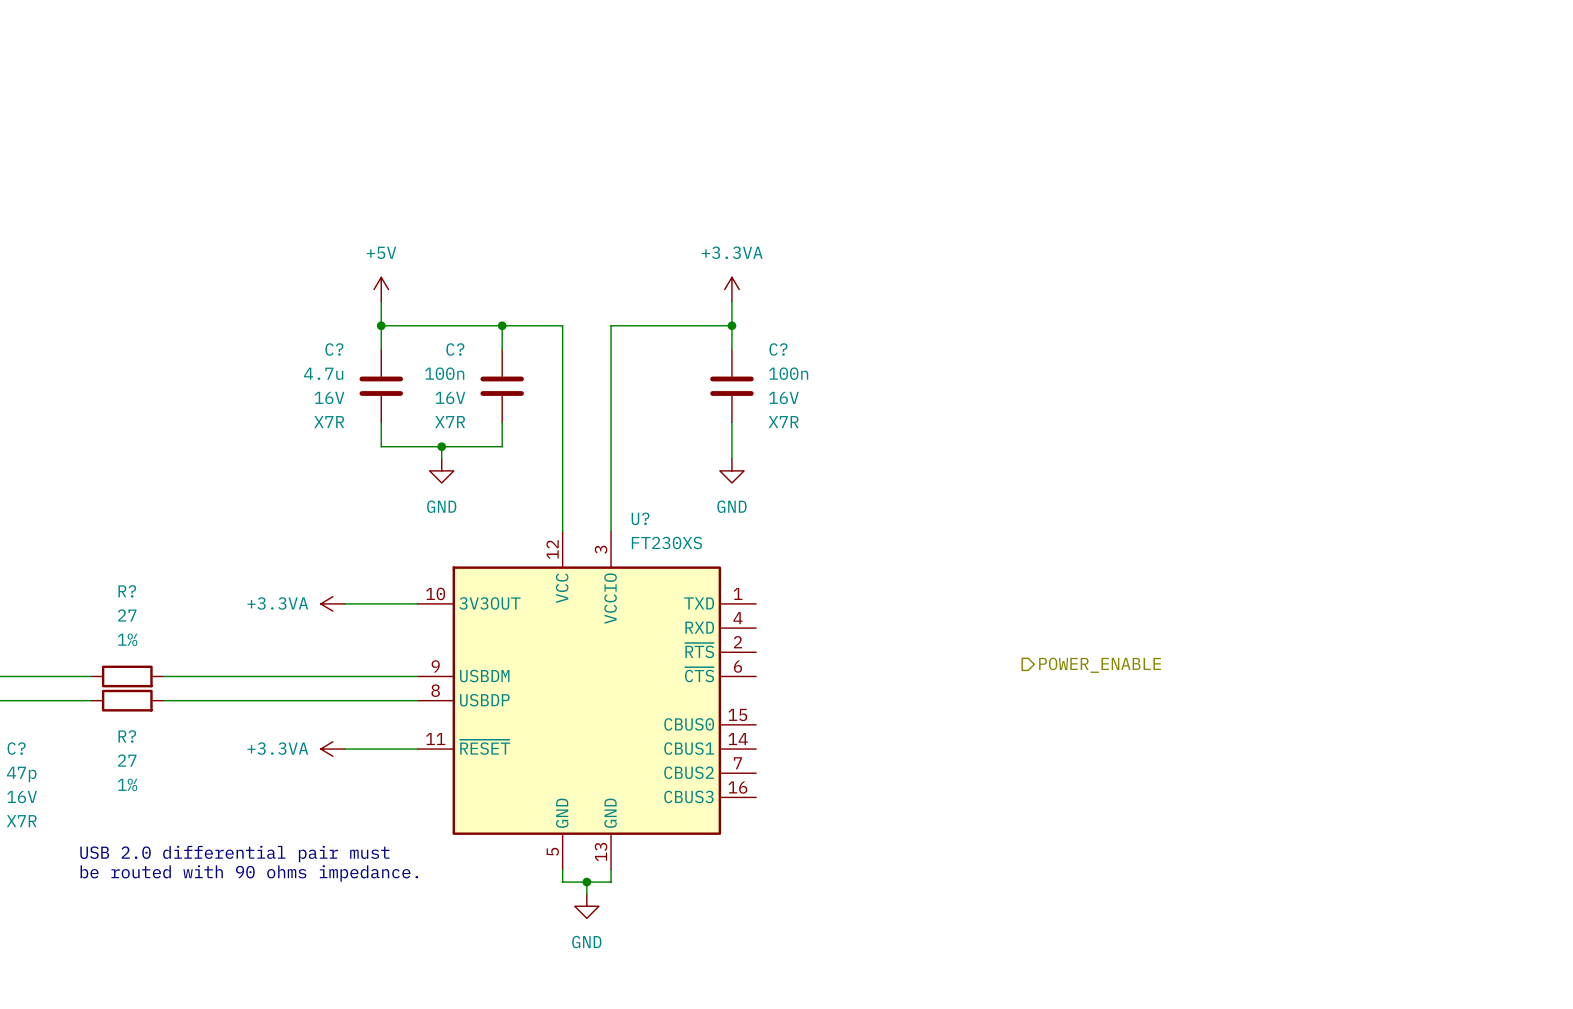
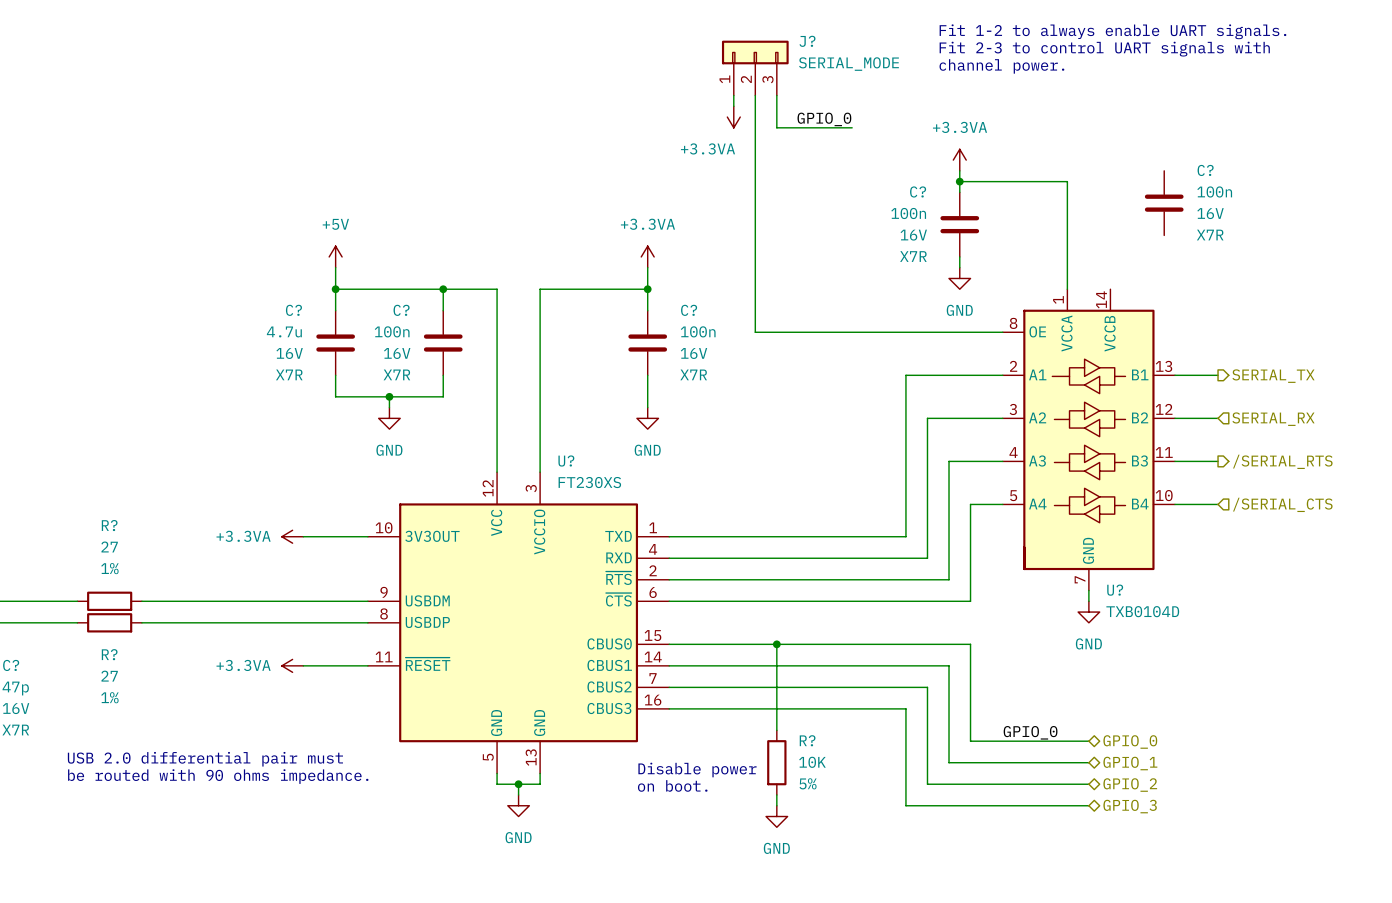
text: none -> Fit 1-2 to always enable UART signals. (1112, 31)
text: none -> Fit 2-3 to control UART signals with (1104, 49)
text: none -> channel power. (1001, 66)
J?: none -> SERIAL_MODE (755, 68)
wire: none -> (733, 95) (733, 106)
wire: none -> (755, 95) (755, 332) (1002, 332)
wire: none -> (776, 95) (776, 127) (852, 127)
power symbol: none -> +3.3VA (733, 117)
label: none -> GPIO_0 (824, 119)
power symbol: none -> +3.3VA (959, 160)
wire: none -> (959, 170) (959, 192)
wire: none -> (959, 181) (1067, 181) (1067, 289)
junction: none -> (959, 181)
C?: none -> 100n (1164, 203)
C?: none -> 100n (959, 224)
wire: none -> (959, 256) (959, 267)
power symbol: none -> GND (959, 278)
wire: none -> (1002, 375) (905, 375) (905, 536) (669, 536)
wire: none -> (1174, 375) (1218, 375)
hierarchical label: none -> SERIAL_TX (1273, 376)
wire: none -> (1002, 418) (927, 418) (927, 558) (669, 558)
wire: none -> (1174, 418) (1218, 418)
hierarchical label: none -> SERIAL_RX (1273, 419)
U?: none -> TXB0104D (1088, 439)
wire: none -> (1002, 461) (949, 461) (949, 579) (669, 579)
wire: none -> (1174, 461) (1218, 461)
hierarchical label: none -> /SERIAL_RTS (1282, 461)
wire: none -> (1002, 504) (970, 504) (970, 601) (669, 601)
wire: none -> (1174, 504) (1218, 504)
hierarchical label: none -> /SERIAL_CTS (1282, 504)
wire: none -> (1088, 590) (1088, 601)
hierarchical label: POWER_ENABLE (1100, 665) -> none
power symbol: none -> GND (1088, 612)
wire: none -> (669, 644) (970, 644) (970, 741) (1088, 741)
wire: none -> (776, 644) (776, 730)
junction: none -> (776, 644)
wire: none -> (669, 665) (949, 665) (949, 762) (1088, 762)
wire: none -> (669, 687) (927, 687) (927, 784) (1088, 784)
wire: none -> (669, 708) (905, 708) (905, 805) (1088, 805)
label: none -> GPIO_0 (1030, 732)
hierarchical label: none -> GPIO_0 (1130, 741)
R?: none -> 10K (776, 762)
hierarchical label: none -> GPIO_1 (1130, 763)
text: none -> Disable power (697, 770)
hierarchical label: none -> GPIO_2 (1130, 785)
text: none -> on boot. (672, 785)
wire: none -> (776, 794) (776, 805)
hierarchical label: none -> GPIO_3 (1130, 806)
power symbol: none -> GND (776, 816)

